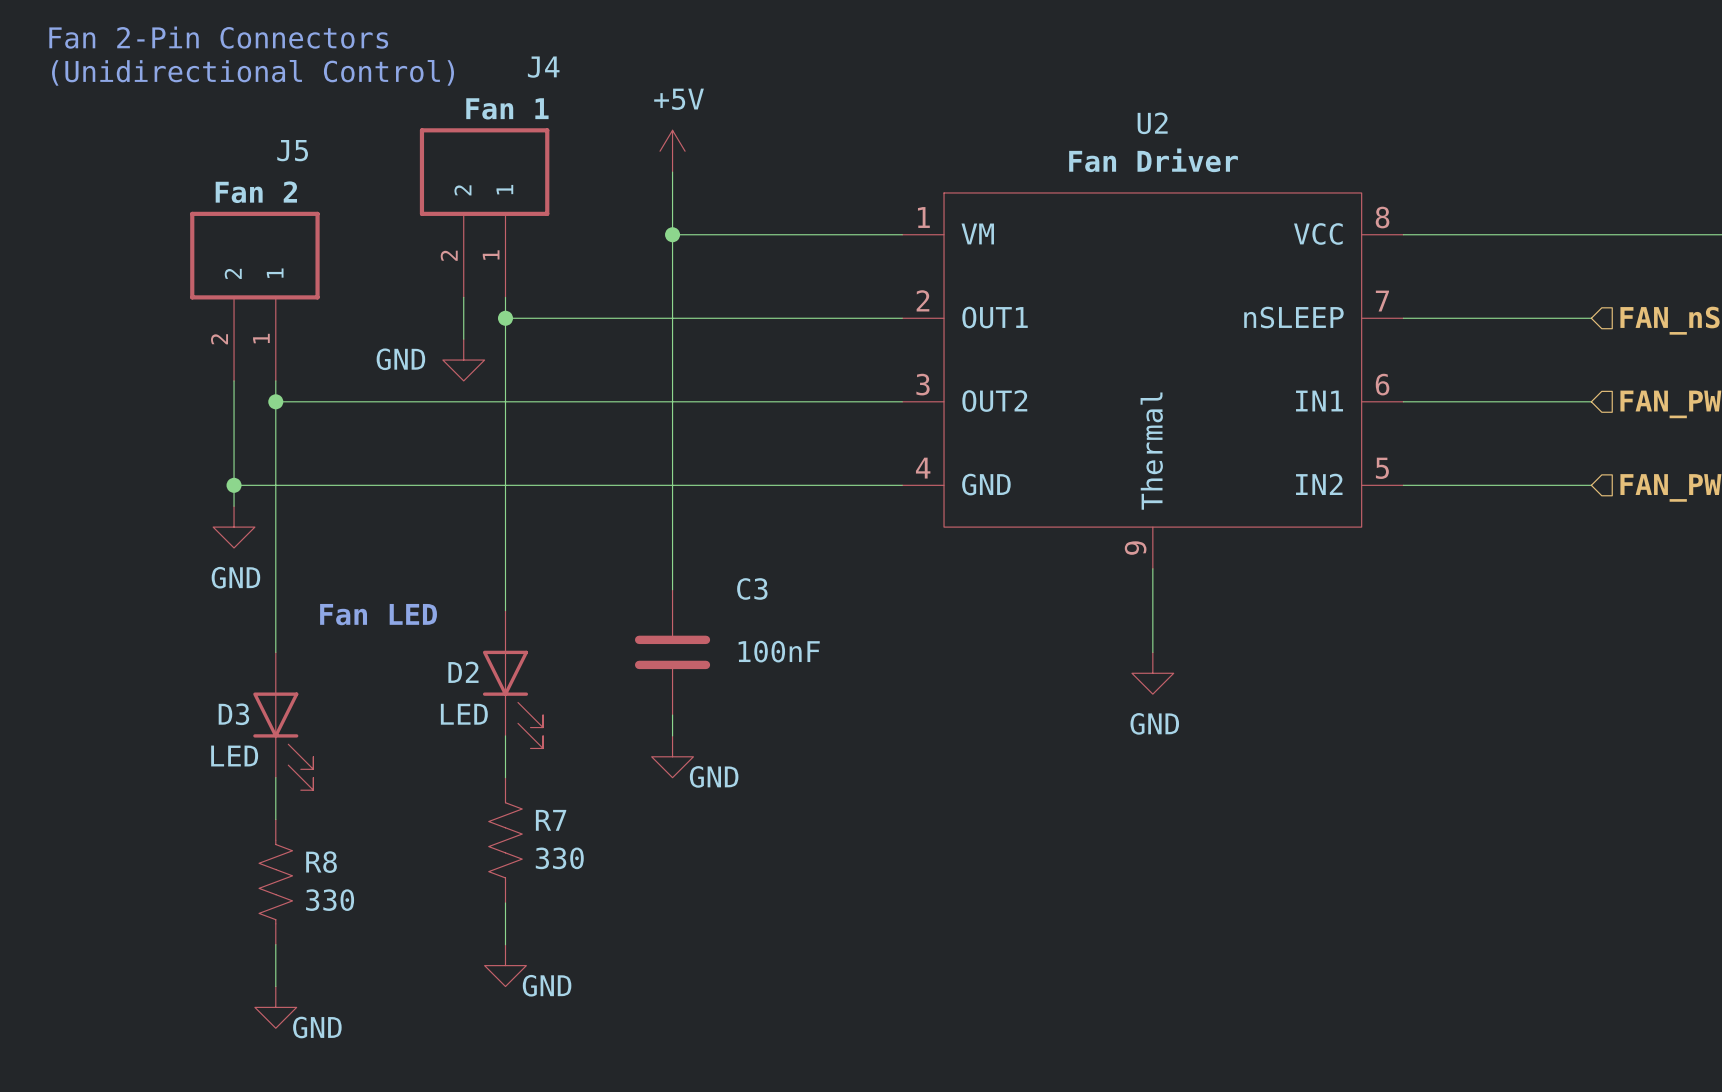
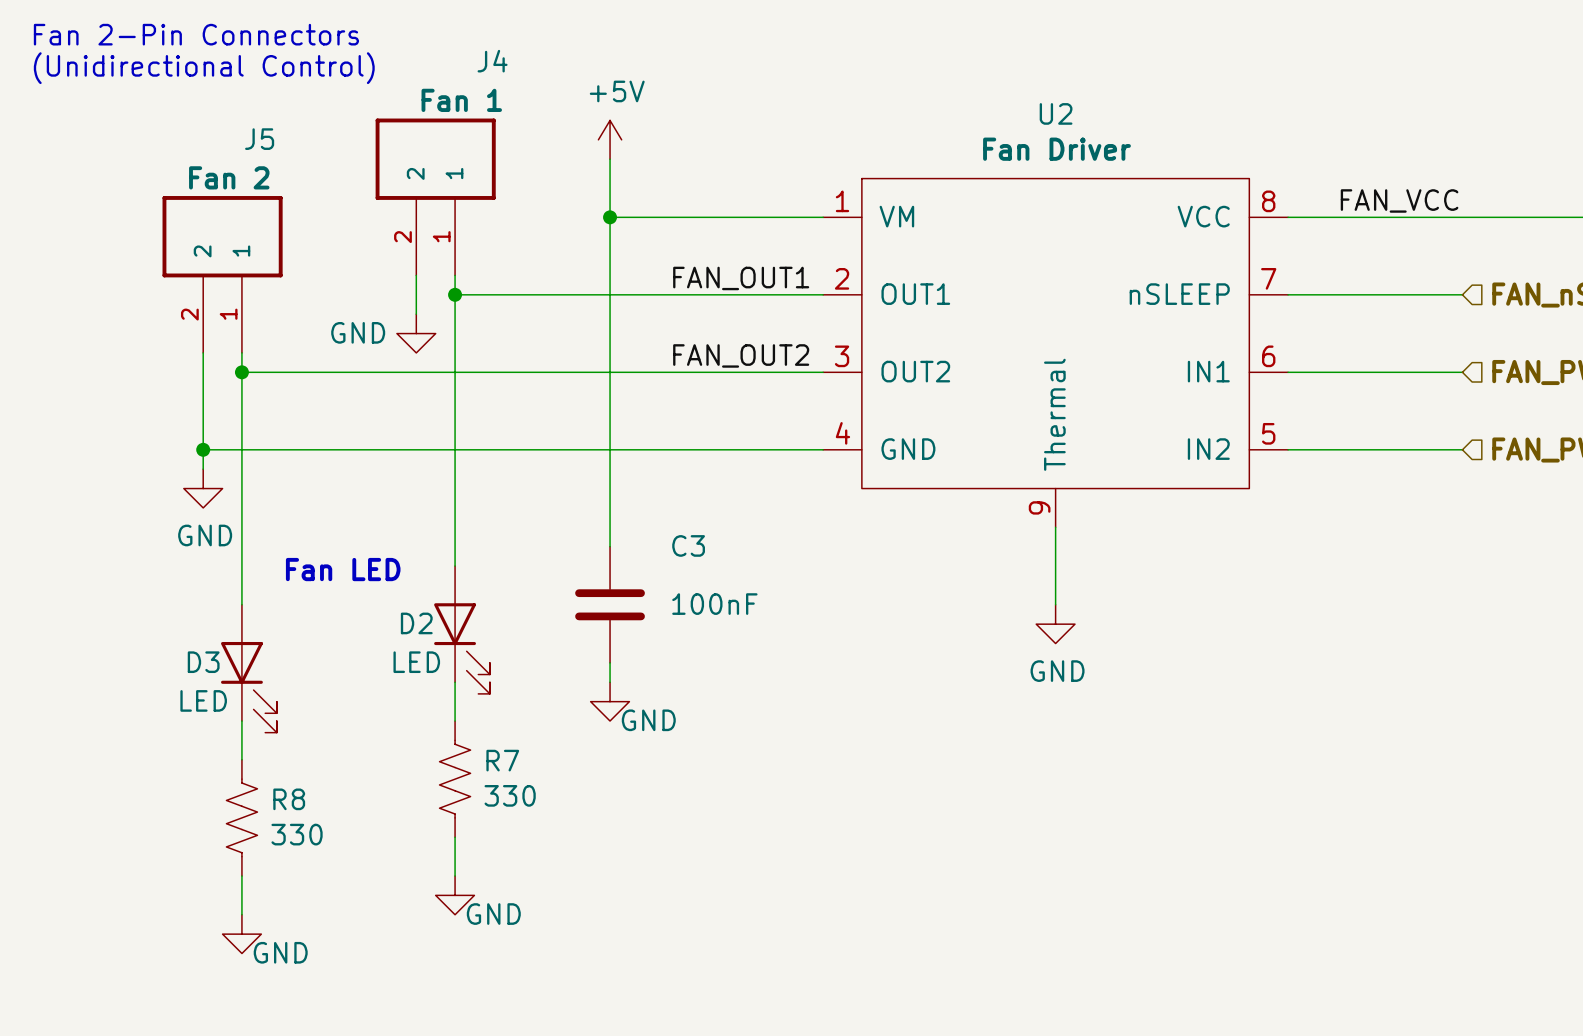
label: none -> FAN_VCC (1399, 200)
label: none -> FAN_OUT1 (741, 278)
label: none -> FAN_OUT2 (741, 355)

